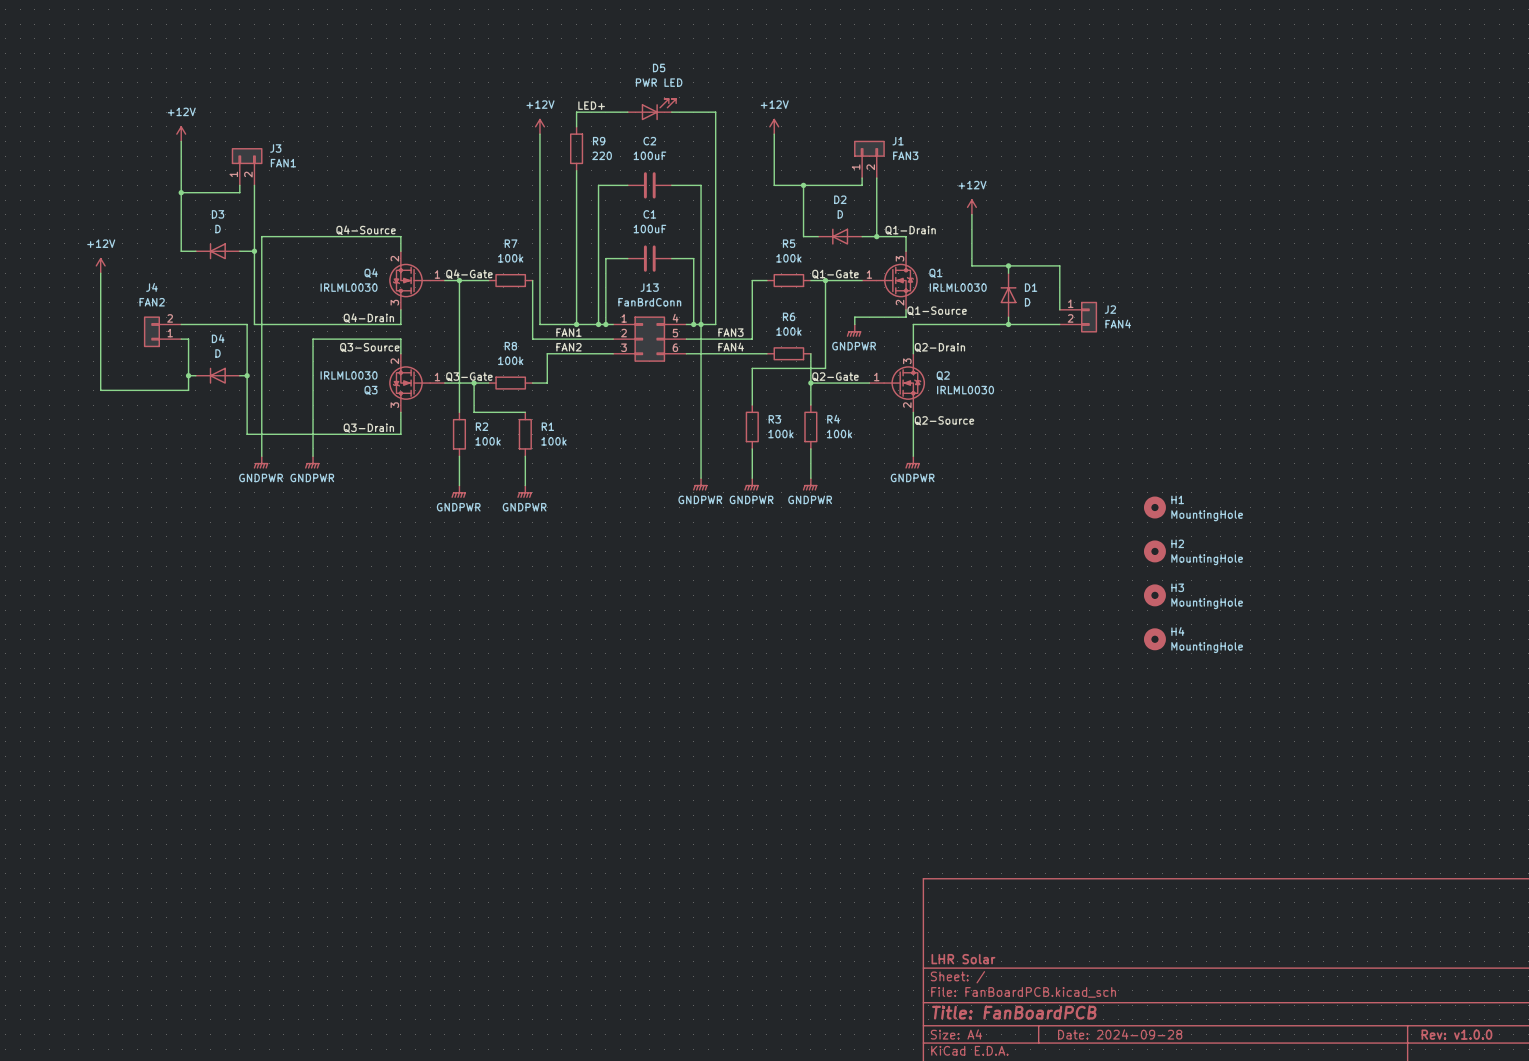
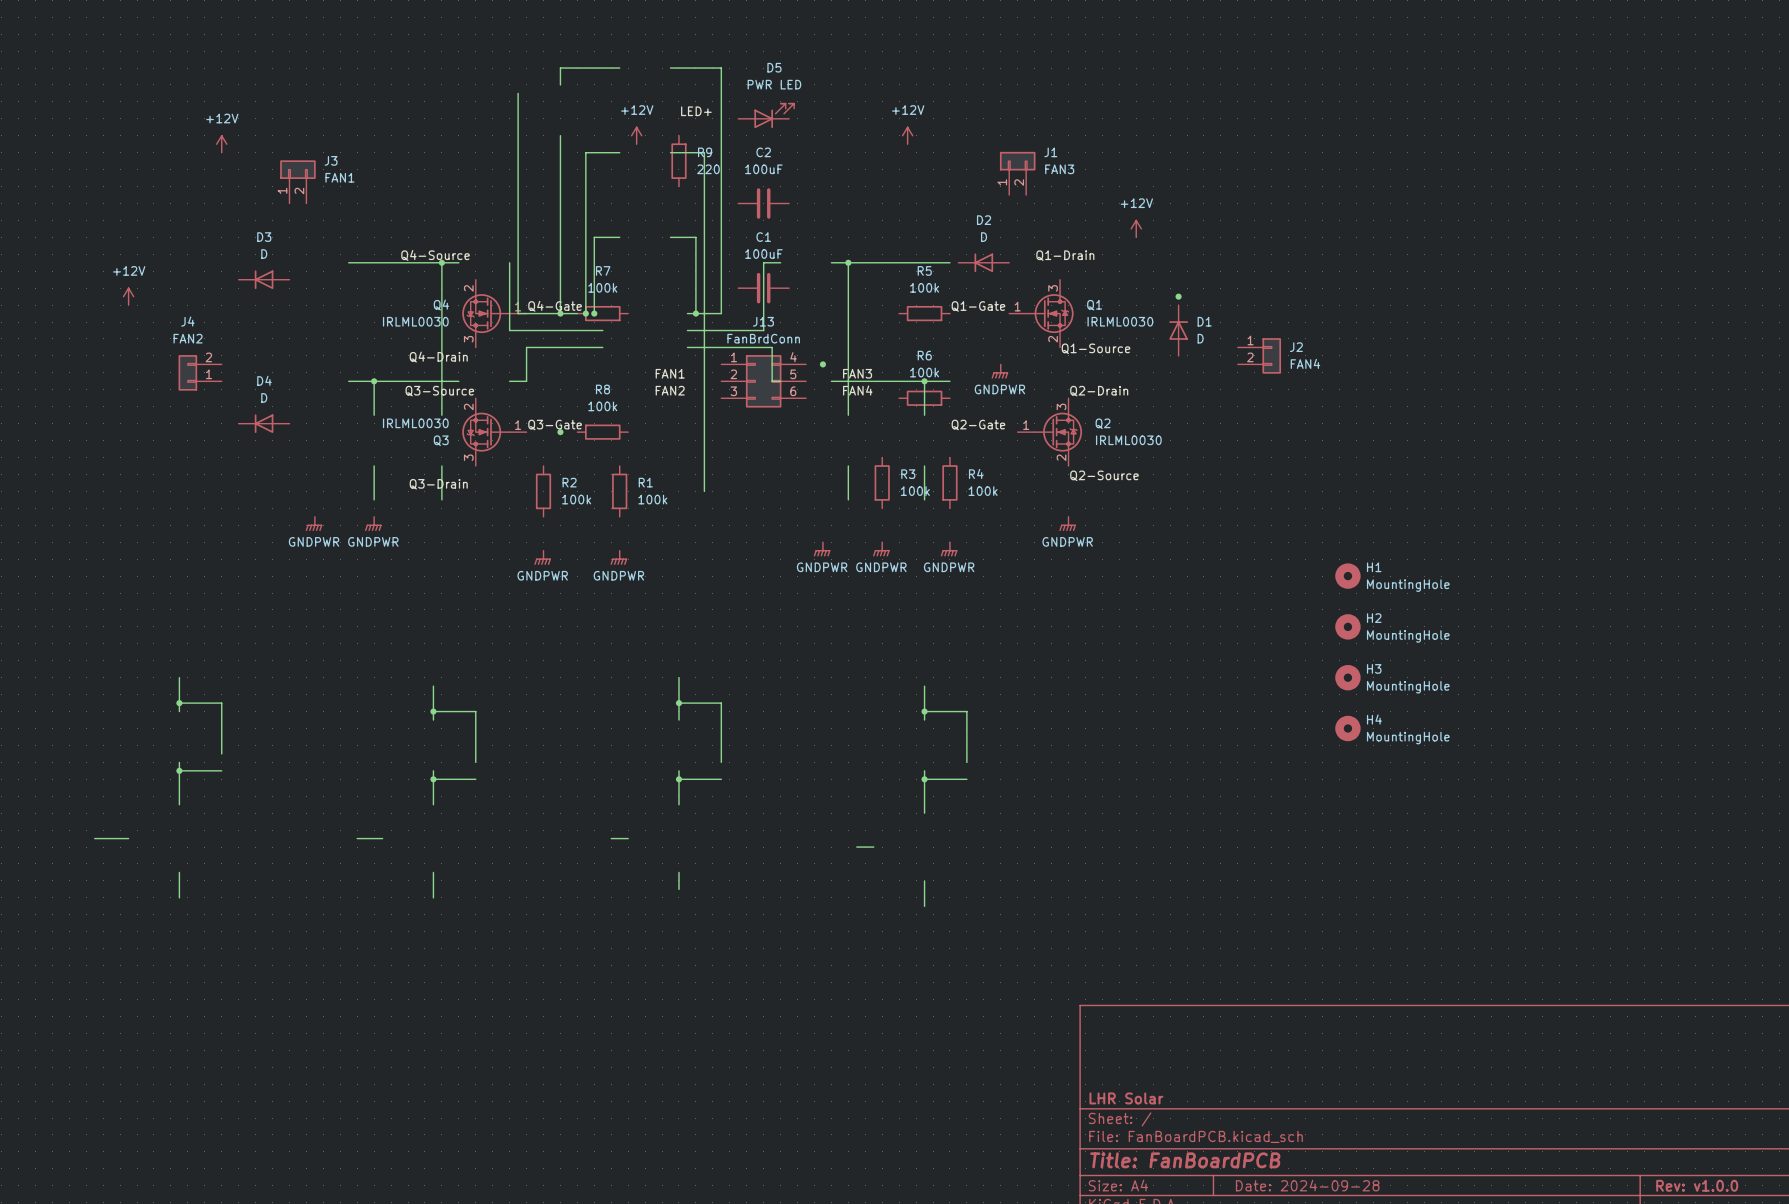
wire: none -> (518, 93) (518, 313) (526, 313)
wire: (627, 112) (576, 112) (576, 126) -> (619, 68) (560, 68) (560, 84)
wire: (671, 112) (715, 112) (715, 324) (686, 324) -> (670, 68) (721, 68) (721, 313) (687, 313)
wire: (539, 134) (539, 324) (613, 324) -> none
wire: (774, 134) (774, 185) (862, 185) (862, 178) -> none
wire: (181, 141) (181, 251) (195, 251) -> none
wire: none -> (619, 152) (585, 152) (585, 313)
wire: (576, 170) (576, 324) -> (560, 135) (560, 313)
wire: (876, 178) (876, 236) -> none
wire: (239, 185) (239, 192) (181, 192) -> none
wire: (254, 185) (254, 324) (400, 324) (400, 309) -> none
wire: (598, 185) (627, 185) -> (704, 203) (704, 152) (670, 152)
wire: (671, 185) (701, 185) (701, 478) -> none
wire: (803, 185) (803, 236) -> (831, 262) (941, 262)
junction: (803, 185) -> none
junction: (181, 192) -> none
wire: (971, 214) (971, 265) (1059, 265) (1059, 309) -> none
wire: (291, 236) (261, 236) (261, 456) -> none
junction: none -> (441, 262)
wire: (386, 236) (400, 236) (400, 251) -> none
wire: none -> (780, 262) (763, 262) (763, 330) (687, 330)
wire: none -> (848, 262) (848, 415)
junction: none -> (848, 262)
wire: (810, 236) (818, 236) -> none
wire: (862, 236) (906, 236) (906, 251) -> none
junction: (876, 236) -> none
wire: (239, 251) (254, 251) -> none
junction: (254, 251) -> none
wire: (627, 258) (605, 258) (605, 324) -> (619, 237) (594, 237) (594, 313)
wire: (671, 258) (693, 258) (693, 324) -> (670, 237) (695, 237) (695, 313)
wire: (1008, 265) (1008, 273) -> none
wire: (100, 273) (100, 390) (188, 390) (188, 339) (181, 339) -> none
wire: (459, 280) (459, 412) -> (441, 262) (441, 415)
junction position: (459, 280) -> (560, 313)
junction: none -> (585, 313)
junction: none -> (594, 313)
wire: (532, 280) (532, 339) (613, 339) -> (509, 262) (509, 330) (602, 330)
junction: none -> (695, 313)
wire: (766, 280) (752, 280) (752, 339) -> (949, 381) (882, 381)
wire: (810, 280) (862, 280) -> none
wire: (825, 280) (825, 368) (752, 368) (752, 405) -> none
junction: (825, 280) -> none
wire: none -> (687, 347) (772, 347) (772, 381) (780, 381)
wire: (906, 309) (906, 317) (854, 317) (854, 324) -> none
wire: (1008, 317) (1008, 324) -> none
wire: (181, 324) (247, 324) (247, 434) (400, 434) (400, 412) -> none
junction: (576, 324) -> none
wire: none -> (704, 364) (704, 491)
junction: (598, 324) -> none
junction: (605, 324) -> none
junction: (693, 324) -> none
junction: (1008, 324) -> none
wire: (1059, 324) (913, 324) (913, 353) -> none
wire: none -> (348, 381) (374, 381)
junction: none -> (374, 381)
wire: (386, 339) (400, 339) (400, 353) -> none
wire: (686, 339) (708, 339) -> none
wire: none -> (924, 381) (924, 415)
junction: none -> (924, 381)
wire: (613, 353) (547, 353) (547, 383) (532, 383) -> (602, 347) (526, 347) (526, 381) (509, 381)
wire: (686, 353) (766, 353) -> none
wire: (810, 353) (810, 405) -> none
wire: (313, 368) (313, 412) -> none
wire: (188, 375) (195, 375) -> none
junction: (188, 375) -> none
wire: (239, 375) (247, 375) -> none
junction: (247, 375) -> none
wire: (444, 383) (488, 383) -> none
wire: (474, 383) (474, 412) (525, 412) -> none
wire: (810, 383) (869, 383) -> none
junction: (810, 383) -> none
wire: (913, 412) (913, 456) -> none
wire: (313, 441) (313, 456) -> none
wire: (752, 448) (752, 478) -> (848, 466) (848, 499)
wire: (810, 448) (810, 478) -> (924, 466) (924, 499)
wire: (459, 456) (459, 485) -> (441, 466) (441, 499)
wire: (525, 456) (525, 485) -> none
wire: none -> (179, 677) (179, 711)
wire: none -> (678, 677) (678, 720)
wire: none -> (433, 686) (433, 720)
wire: none -> (924, 686) (924, 720)
wire: none -> (179, 703) (221, 703) (221, 753)
junction: none -> (179, 703)
wire: none -> (678, 703) (721, 703) (721, 762)
junction: none -> (678, 703)
wire: none -> (433, 711) (475, 711) (475, 762)
junction: none -> (433, 711)
wire: none -> (924, 711) (966, 711) (966, 762)
junction: none -> (924, 711)
wire: none -> (179, 762) (179, 804)
wire: none -> (179, 770) (221, 770)
junction: none -> (179, 770)
wire: none -> (433, 770) (433, 804)
wire: none -> (678, 770) (678, 804)
wire: none -> (924, 770) (924, 813)
wire: none -> (433, 779) (475, 779)
junction: none -> (433, 779)
wire: none -> (678, 779) (721, 779)
junction: none -> (678, 779)
wire: none -> (924, 779) (966, 779)
junction: none -> (924, 779)
wire: none -> (94, 838) (128, 838)
wire: none -> (357, 838) (382, 838)
wire: none -> (611, 838) (628, 838)
wire: none -> (856, 847) (873, 847)
wire: none -> (179, 872) (179, 897)
wire: none -> (433, 872) (433, 897)
wire: none -> (678, 872) (678, 889)
wire: none -> (924, 880) (924, 906)

